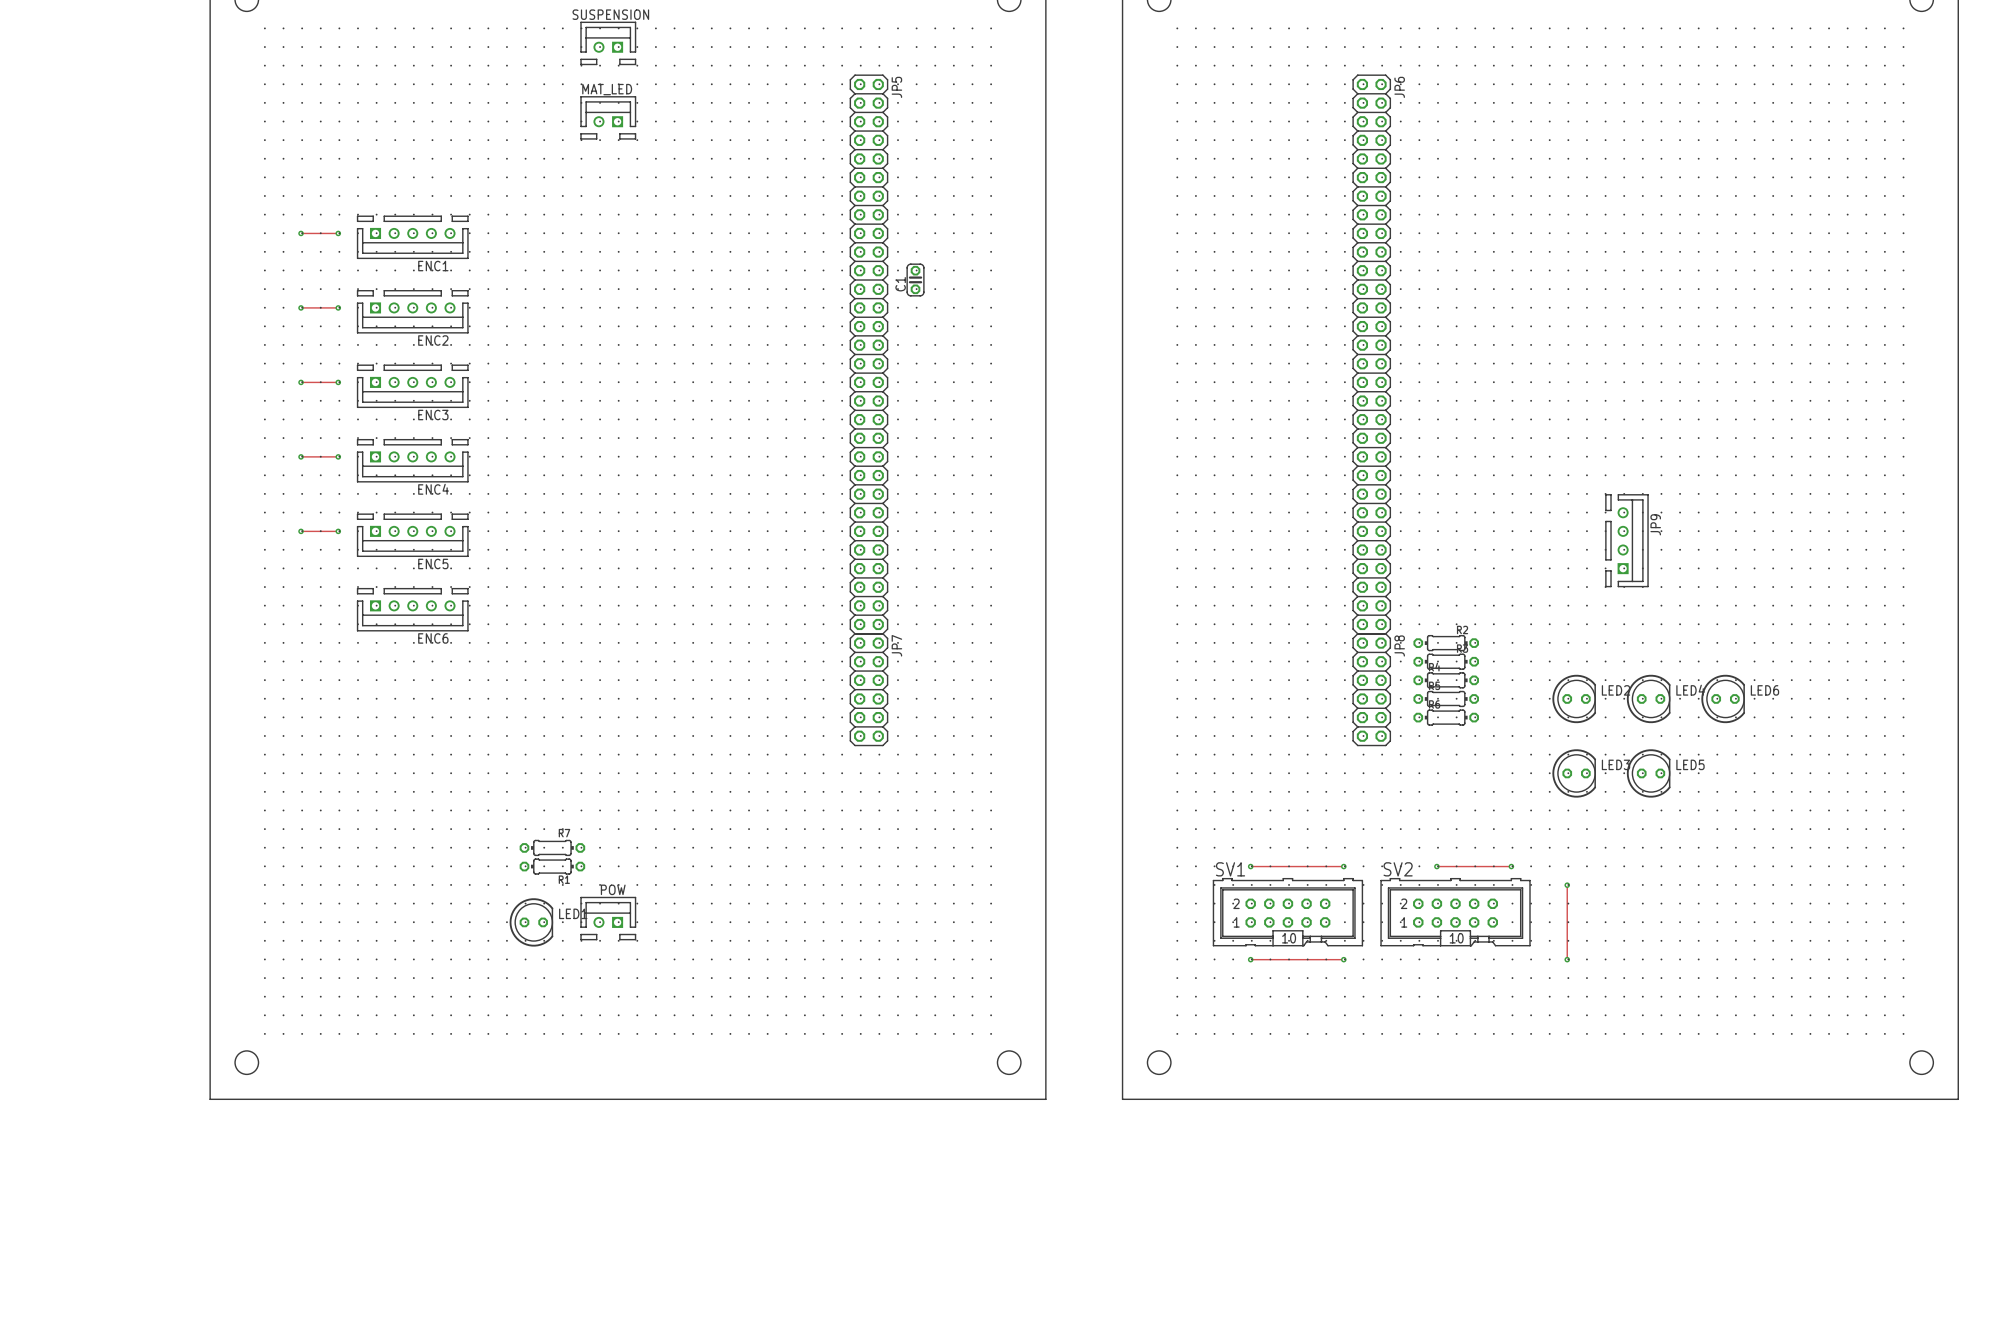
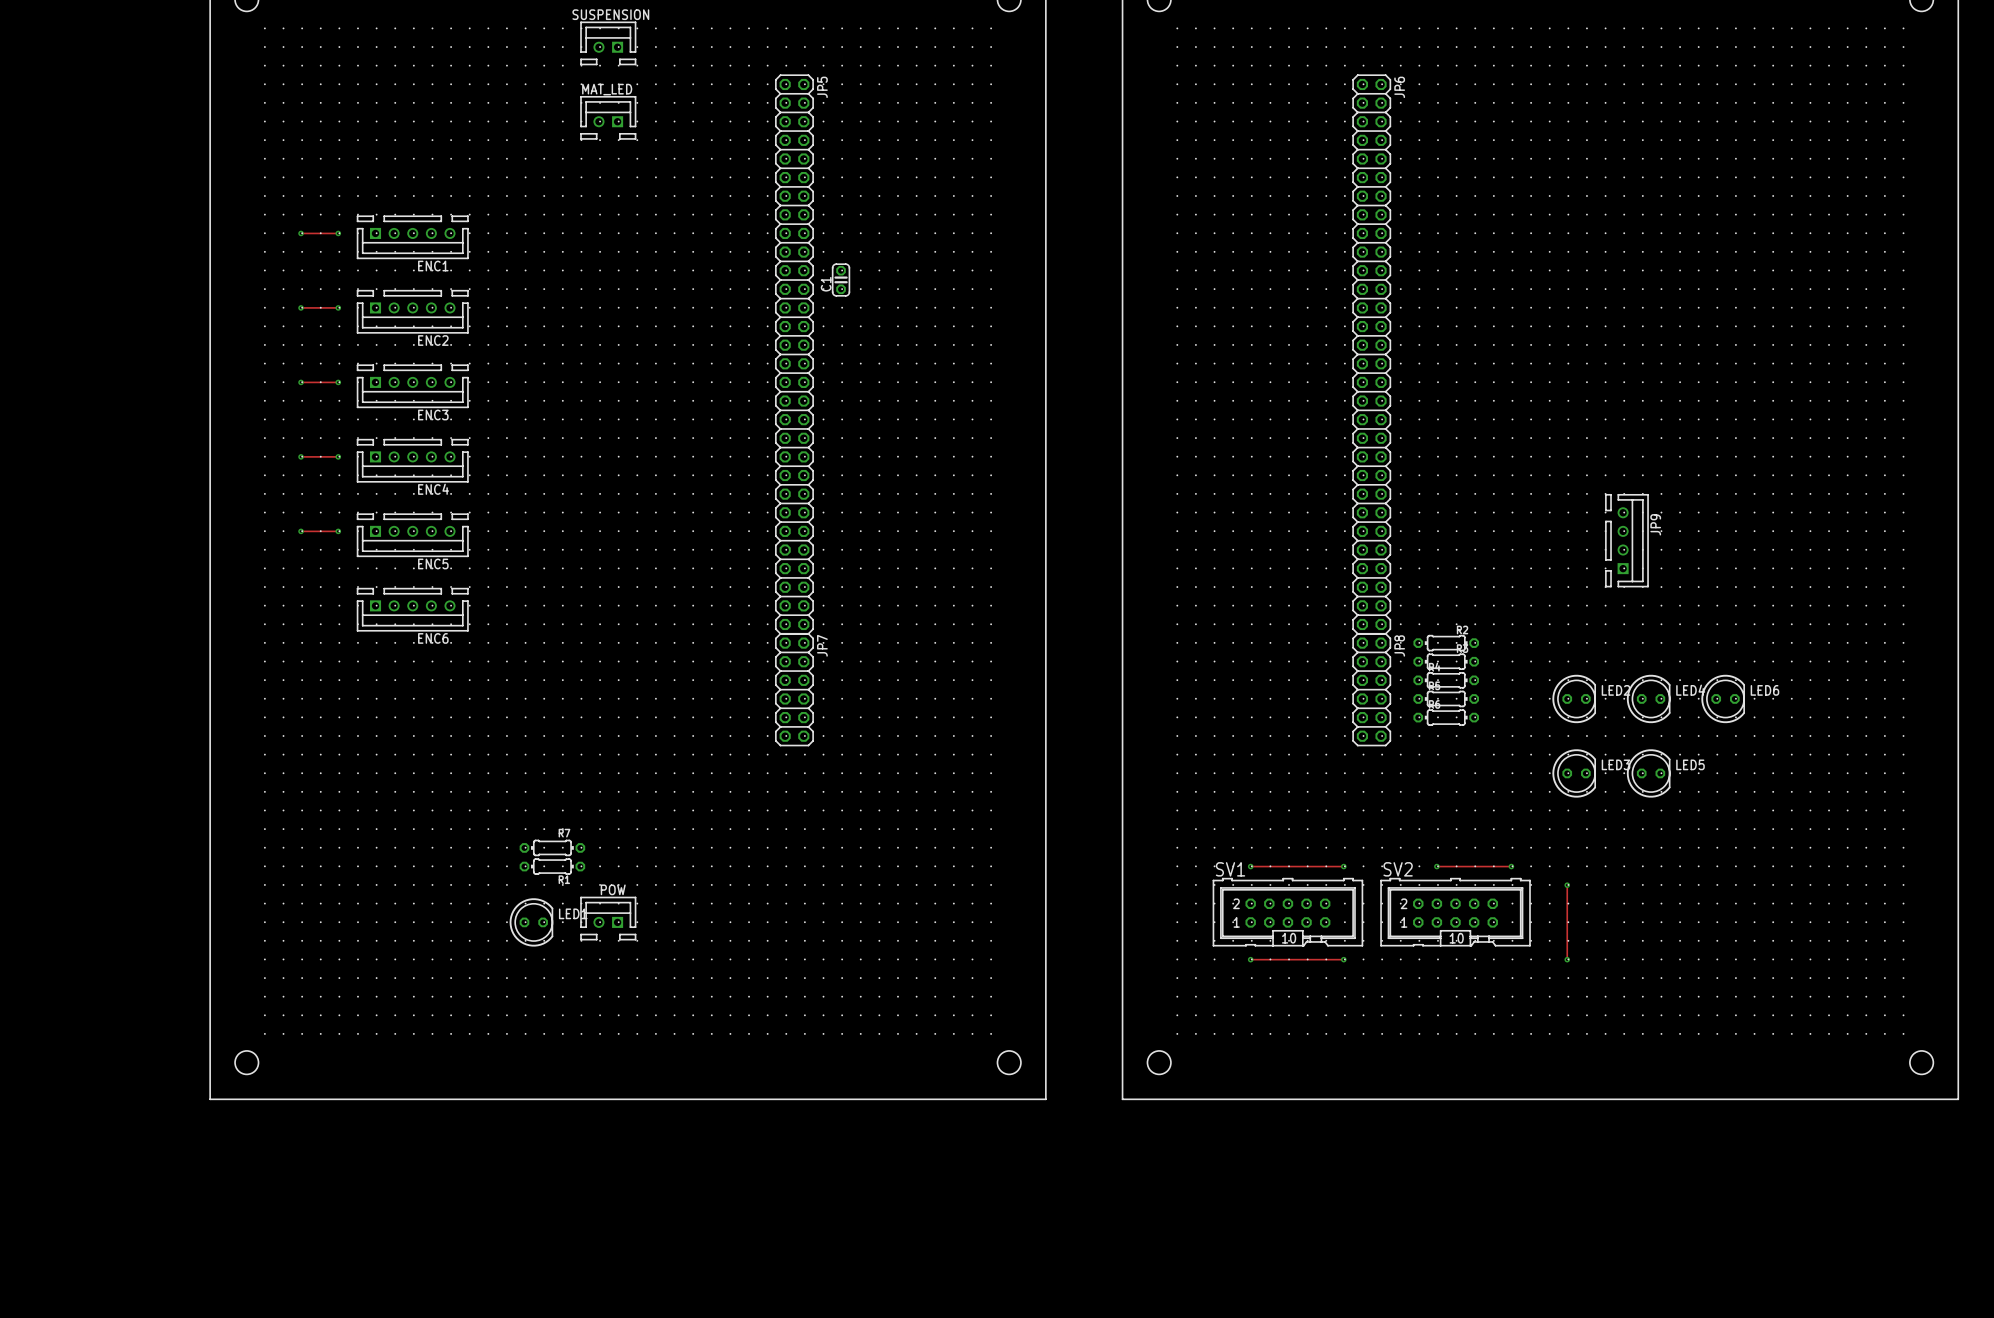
C1 position: (915, 280) -> (841, 280)
JP5 position: (868, 354) -> (794, 354)
JP7 position: (868, 689) -> (794, 689)

